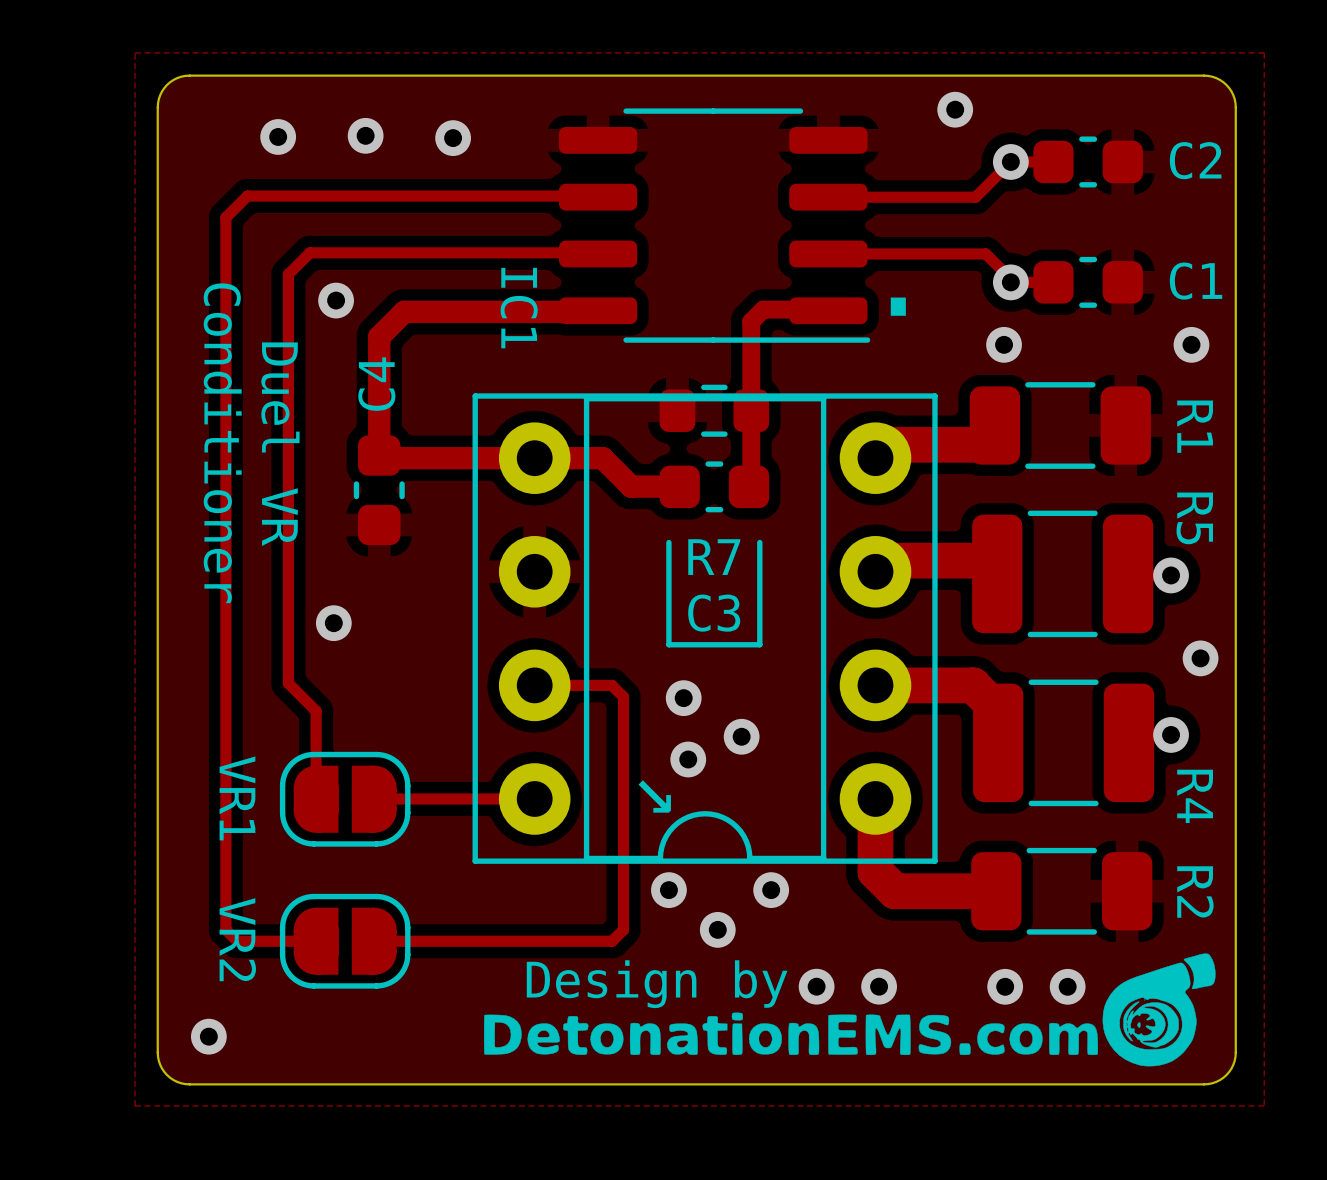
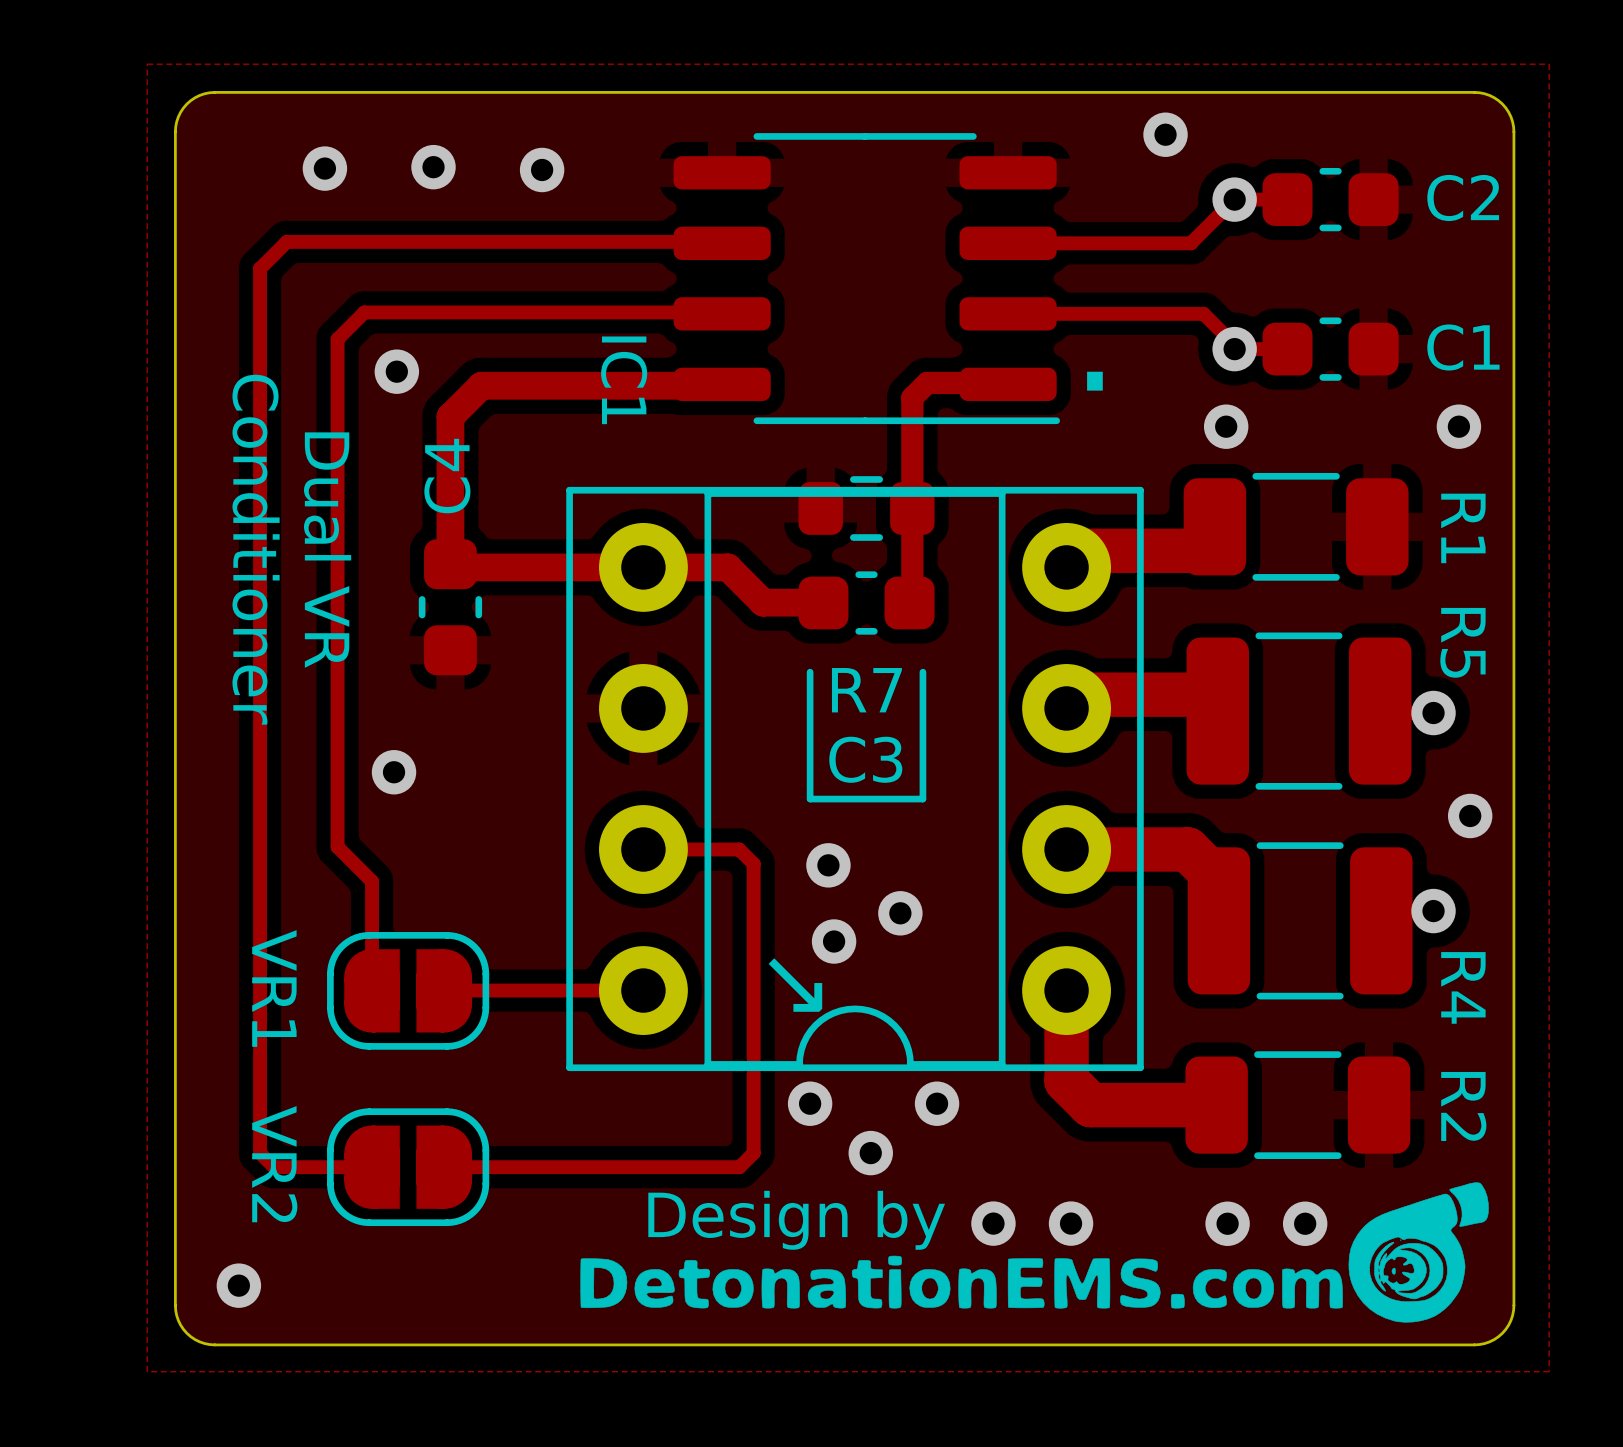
text: Duel VR (280, 444) -> Dual VR (327, 550)

